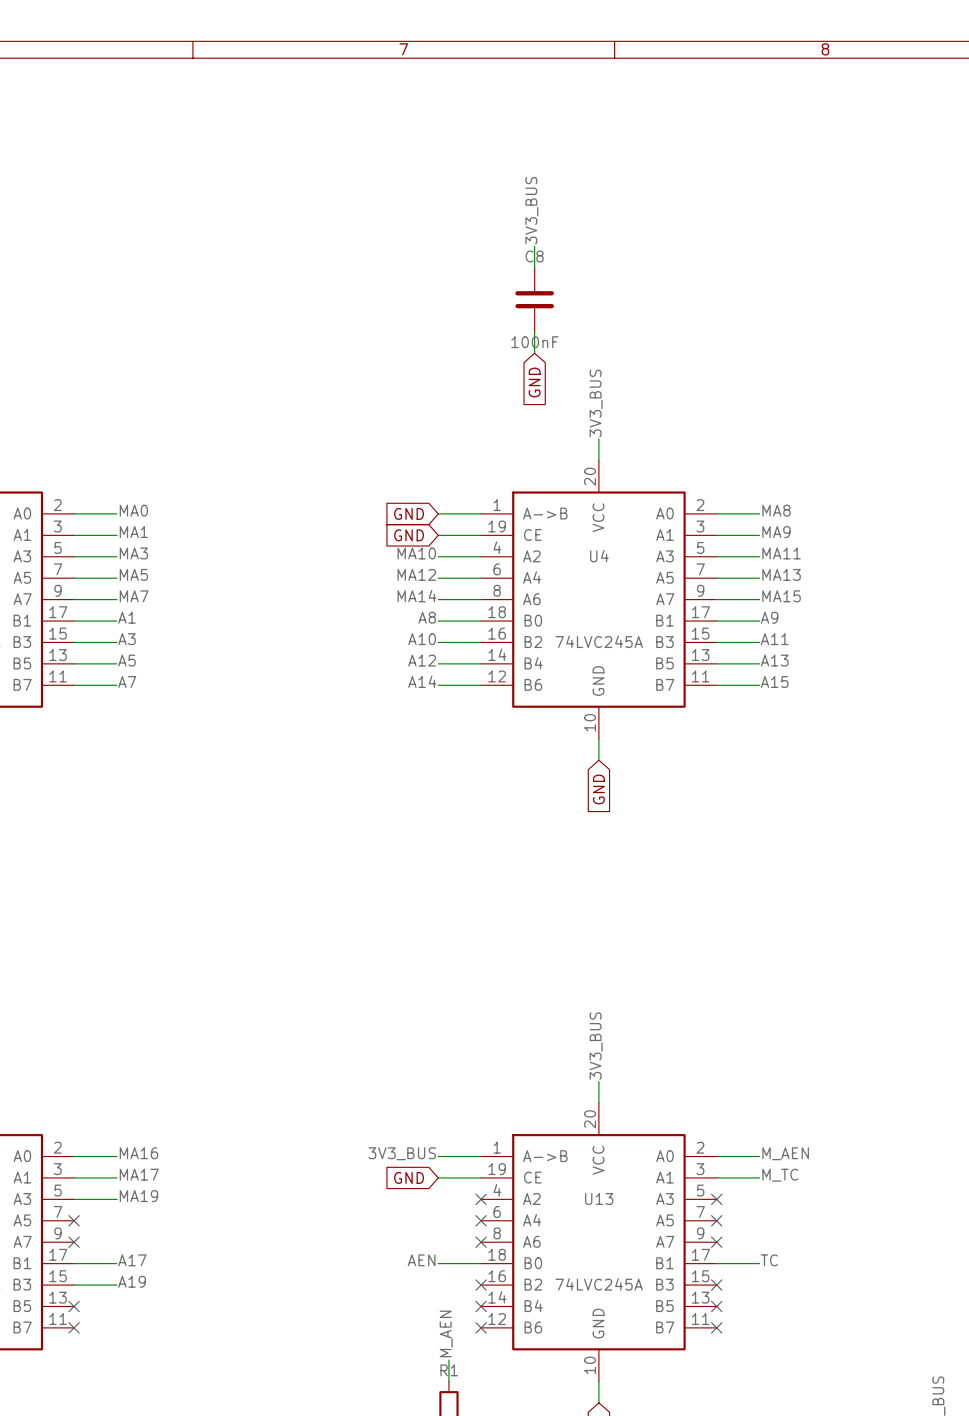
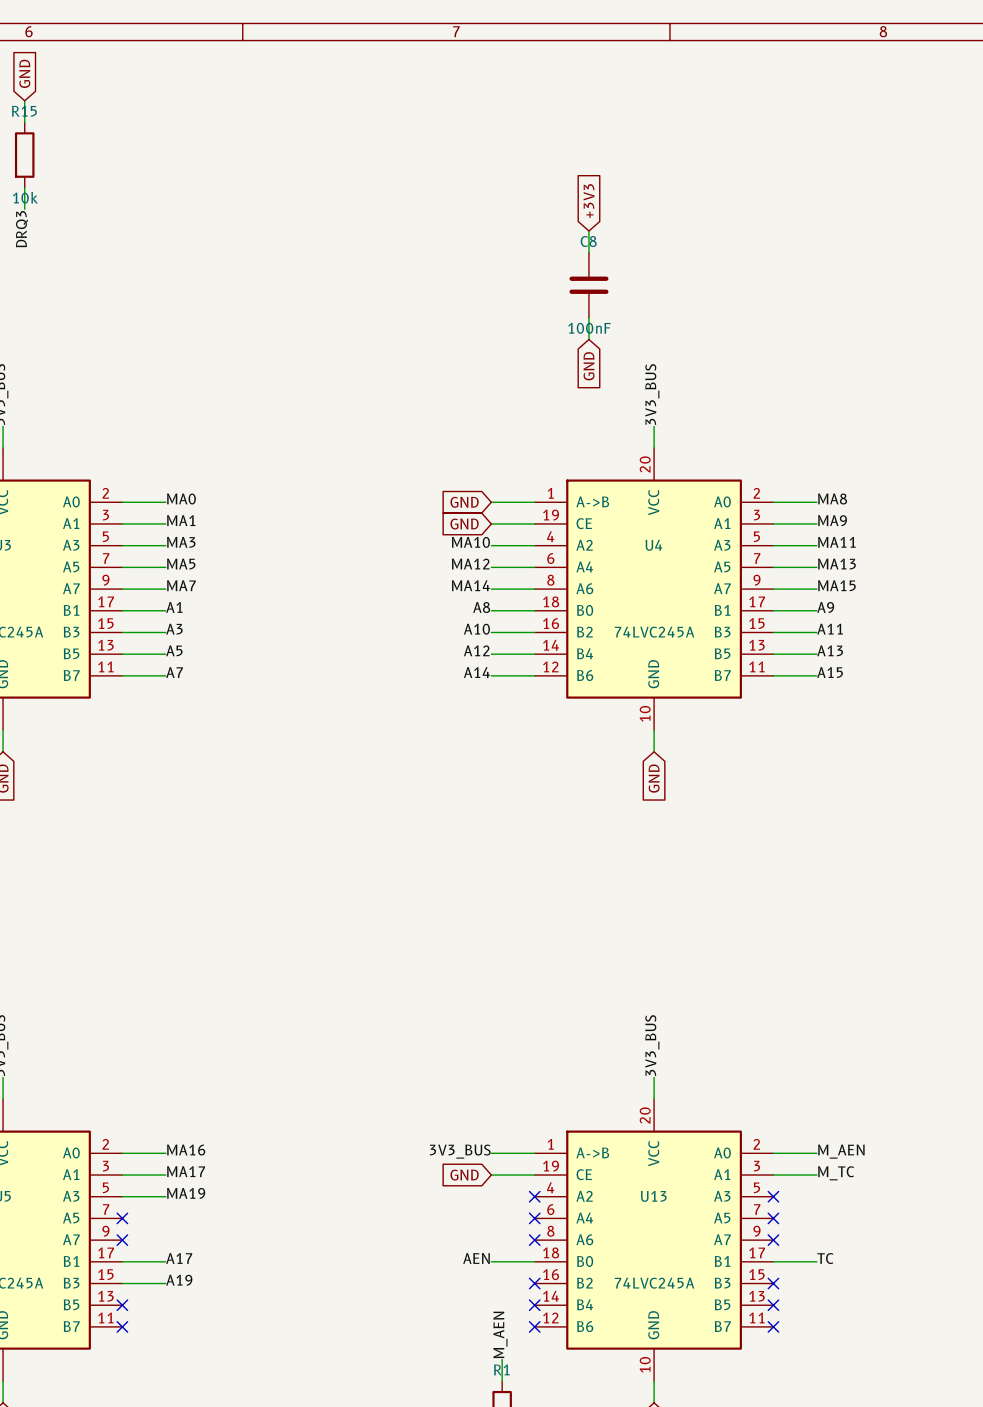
label: 3V3_BUS (531, 210) -> none
global label: none -> +3V3 (589, 201)

